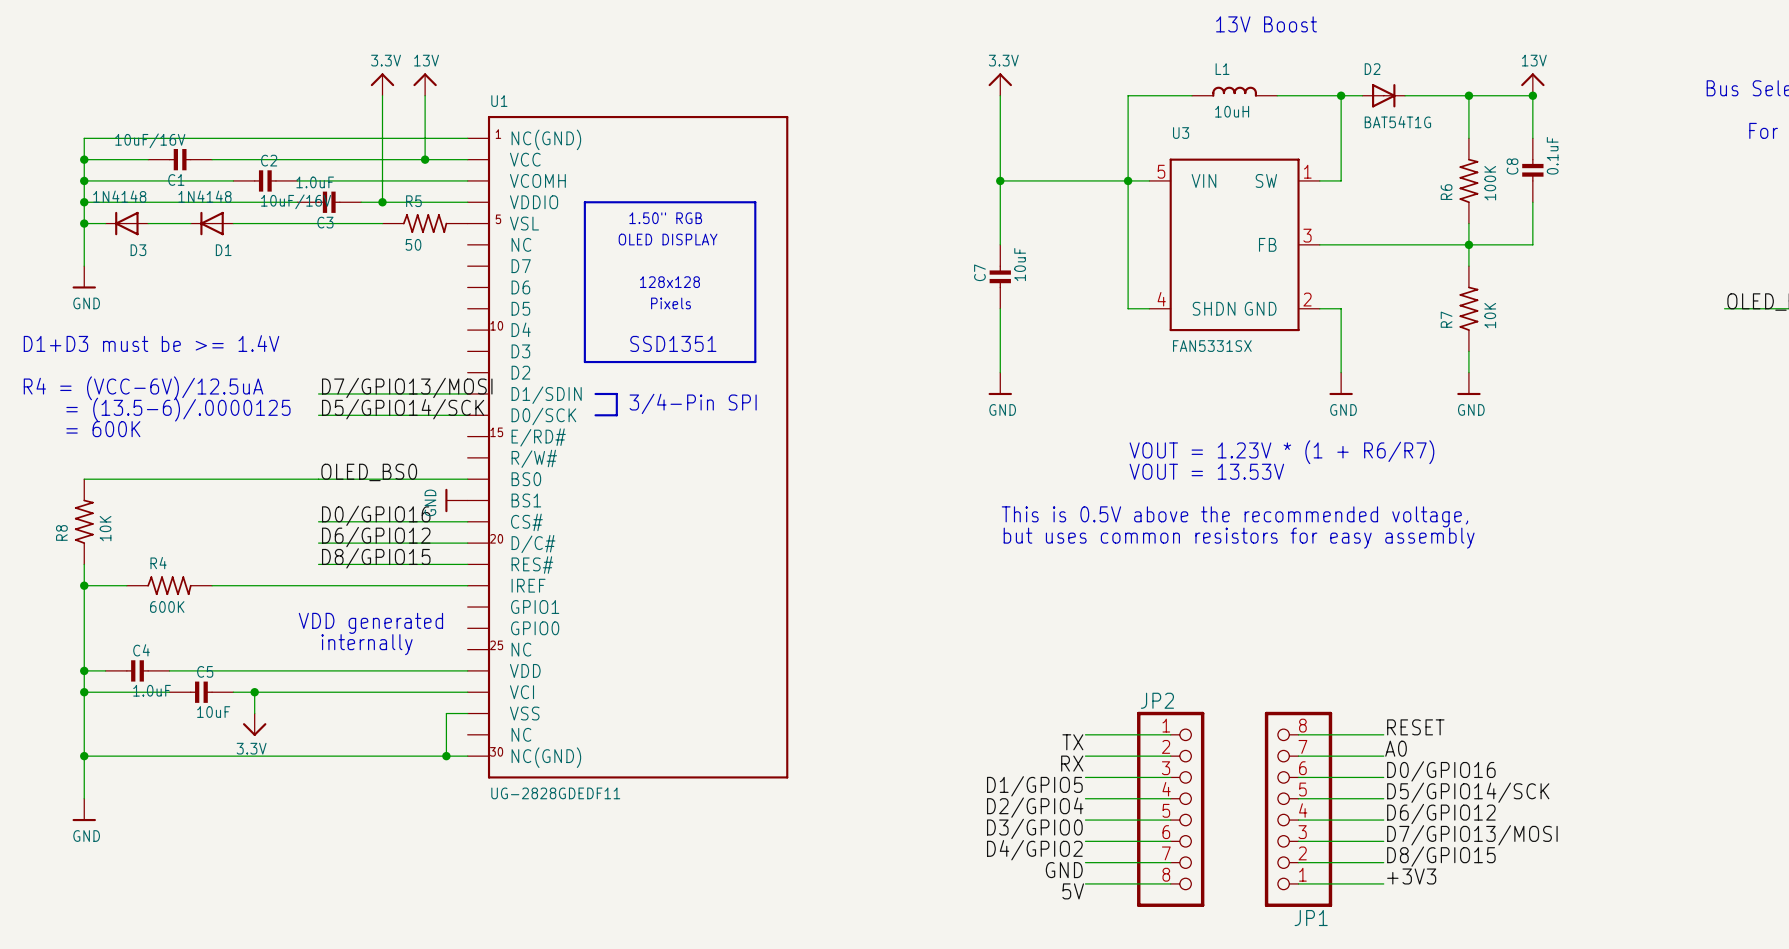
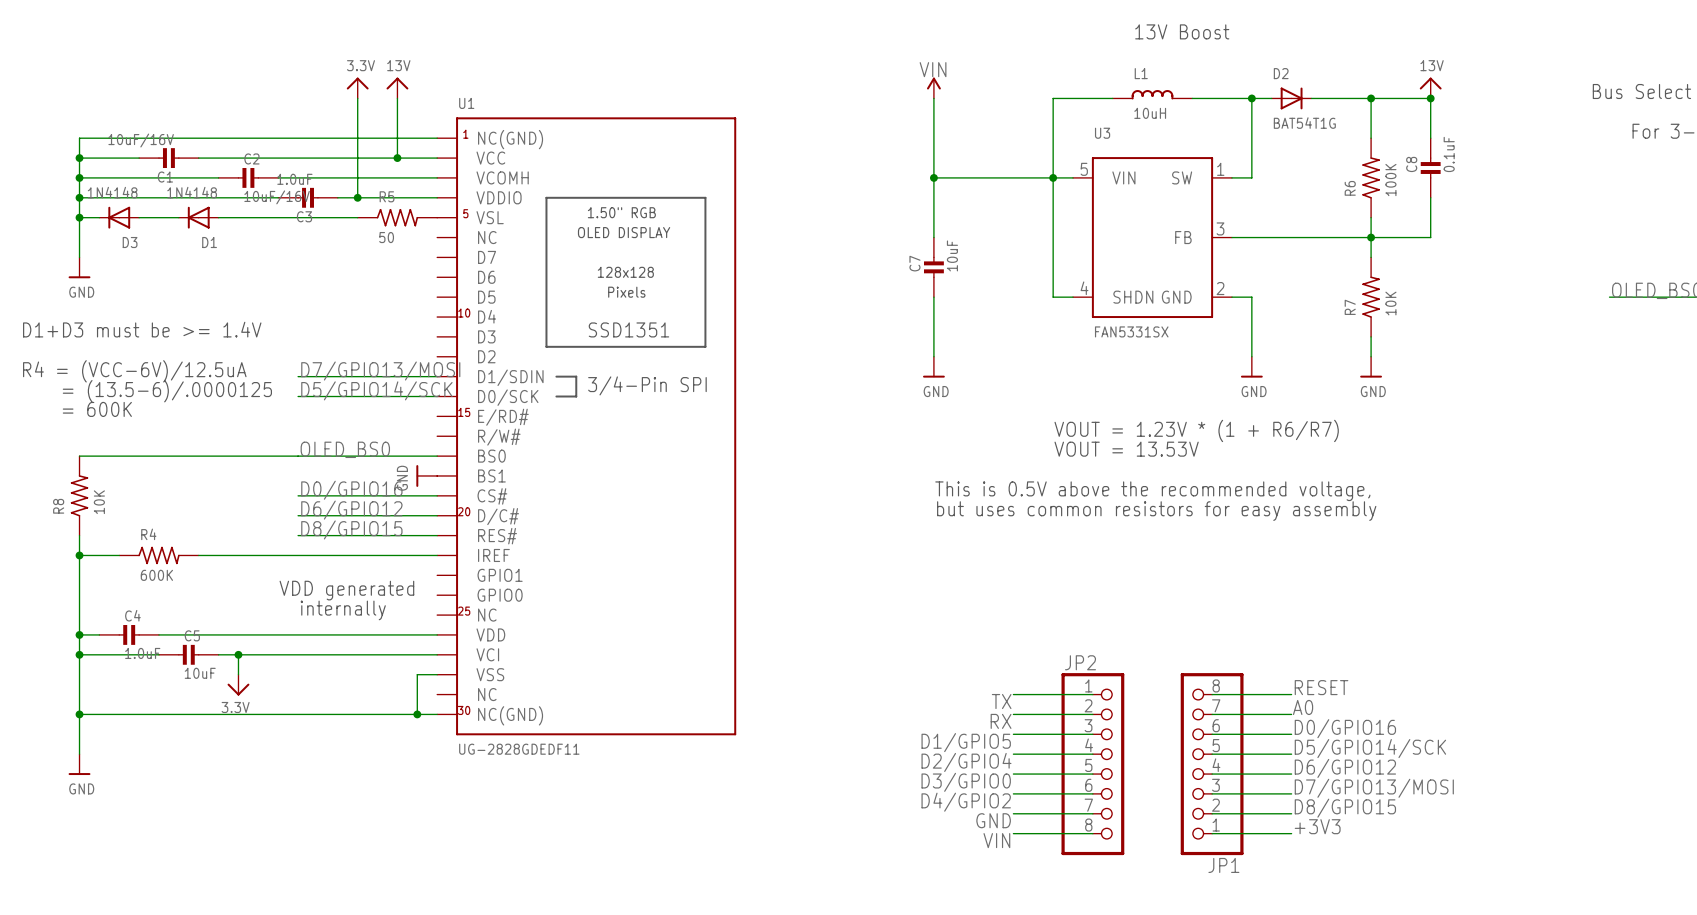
power symbol: 3.3V (1000, 84) -> VIN (933, 88)
label: 5V (1073, 891) -> VIN (996, 840)

